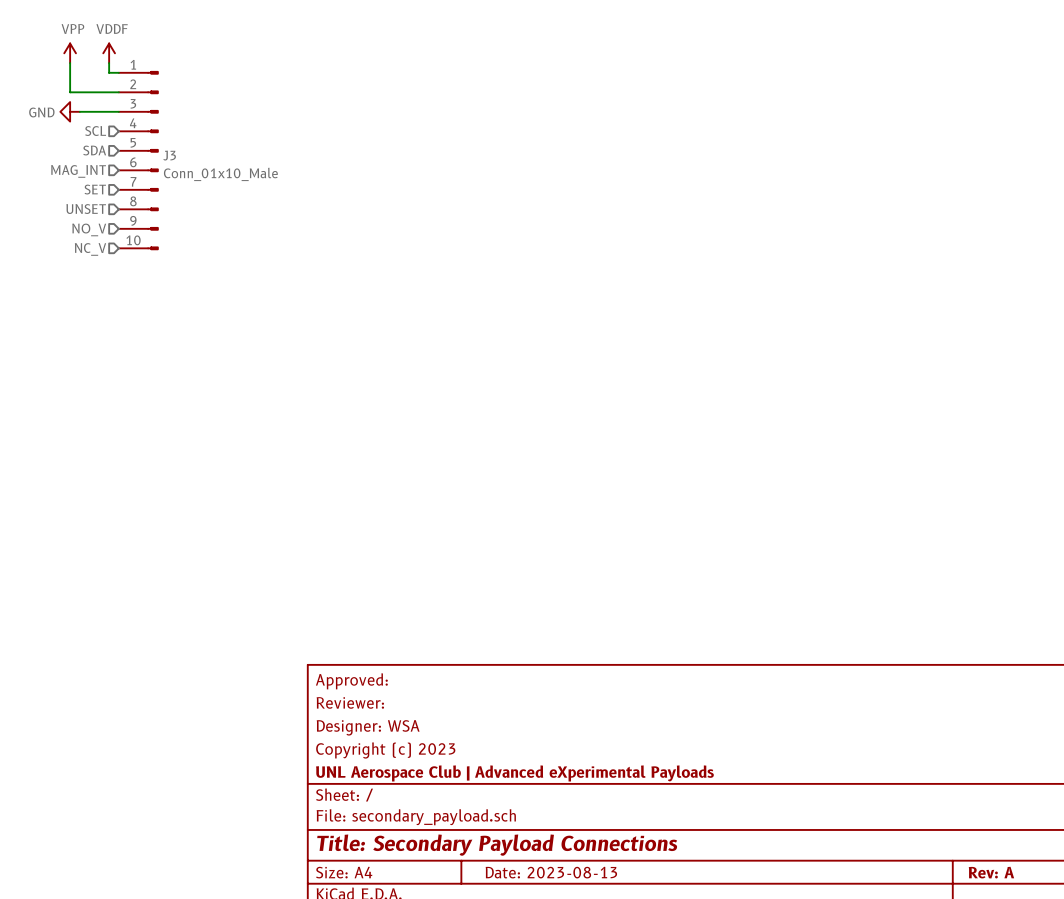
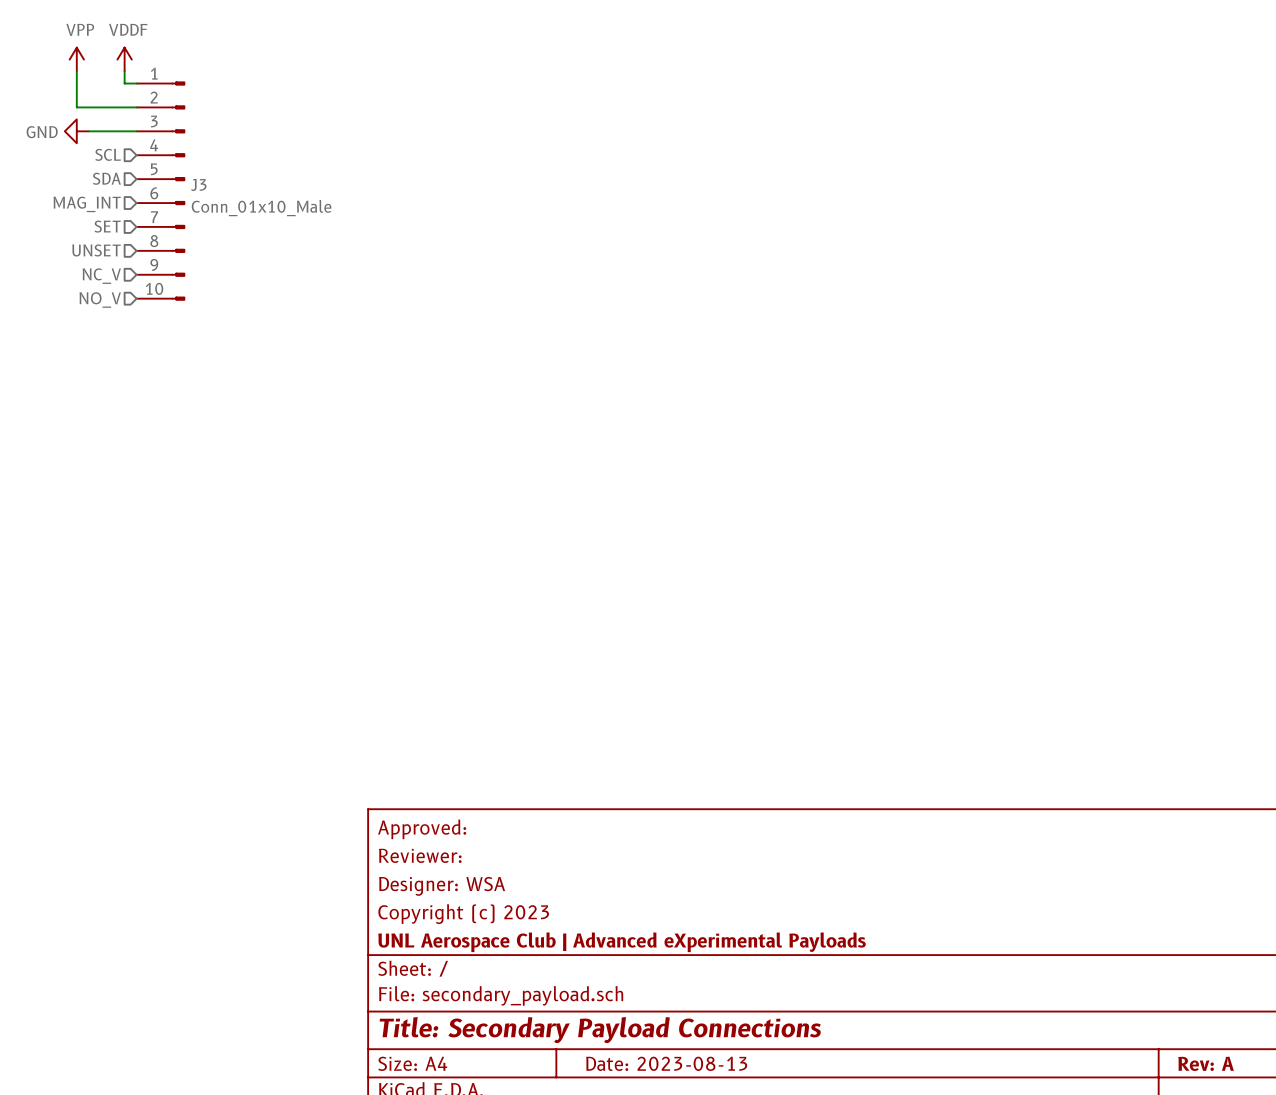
hierarchical label: NO_V (89, 229) -> NC_V (101, 276)
hierarchical label: NC_V (90, 249) -> NO_V (100, 300)

